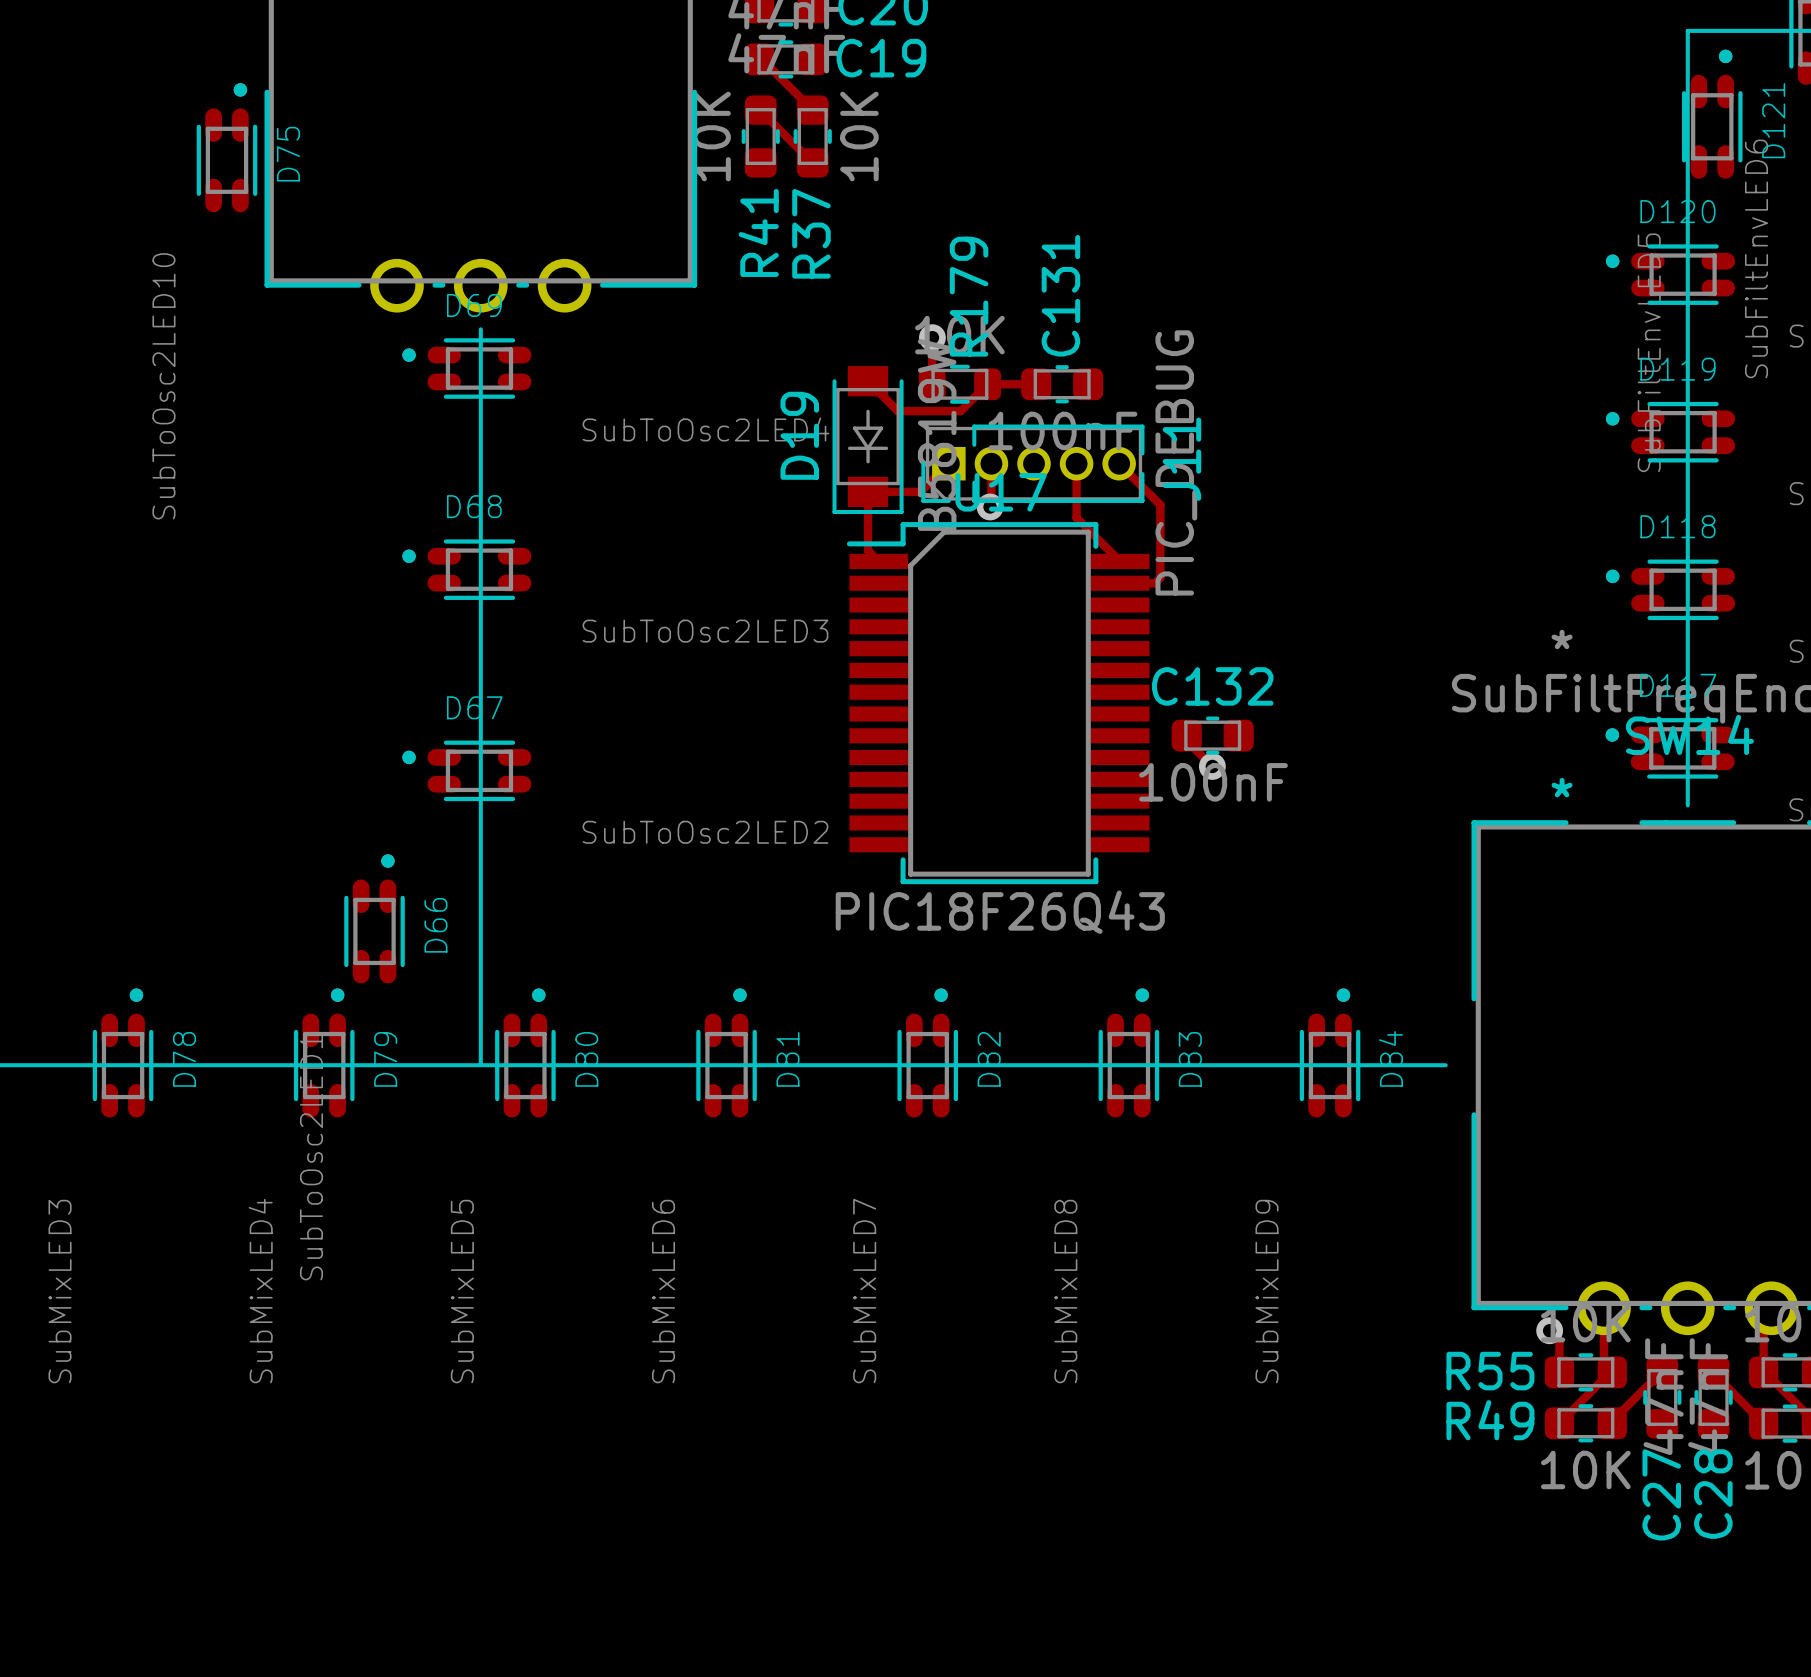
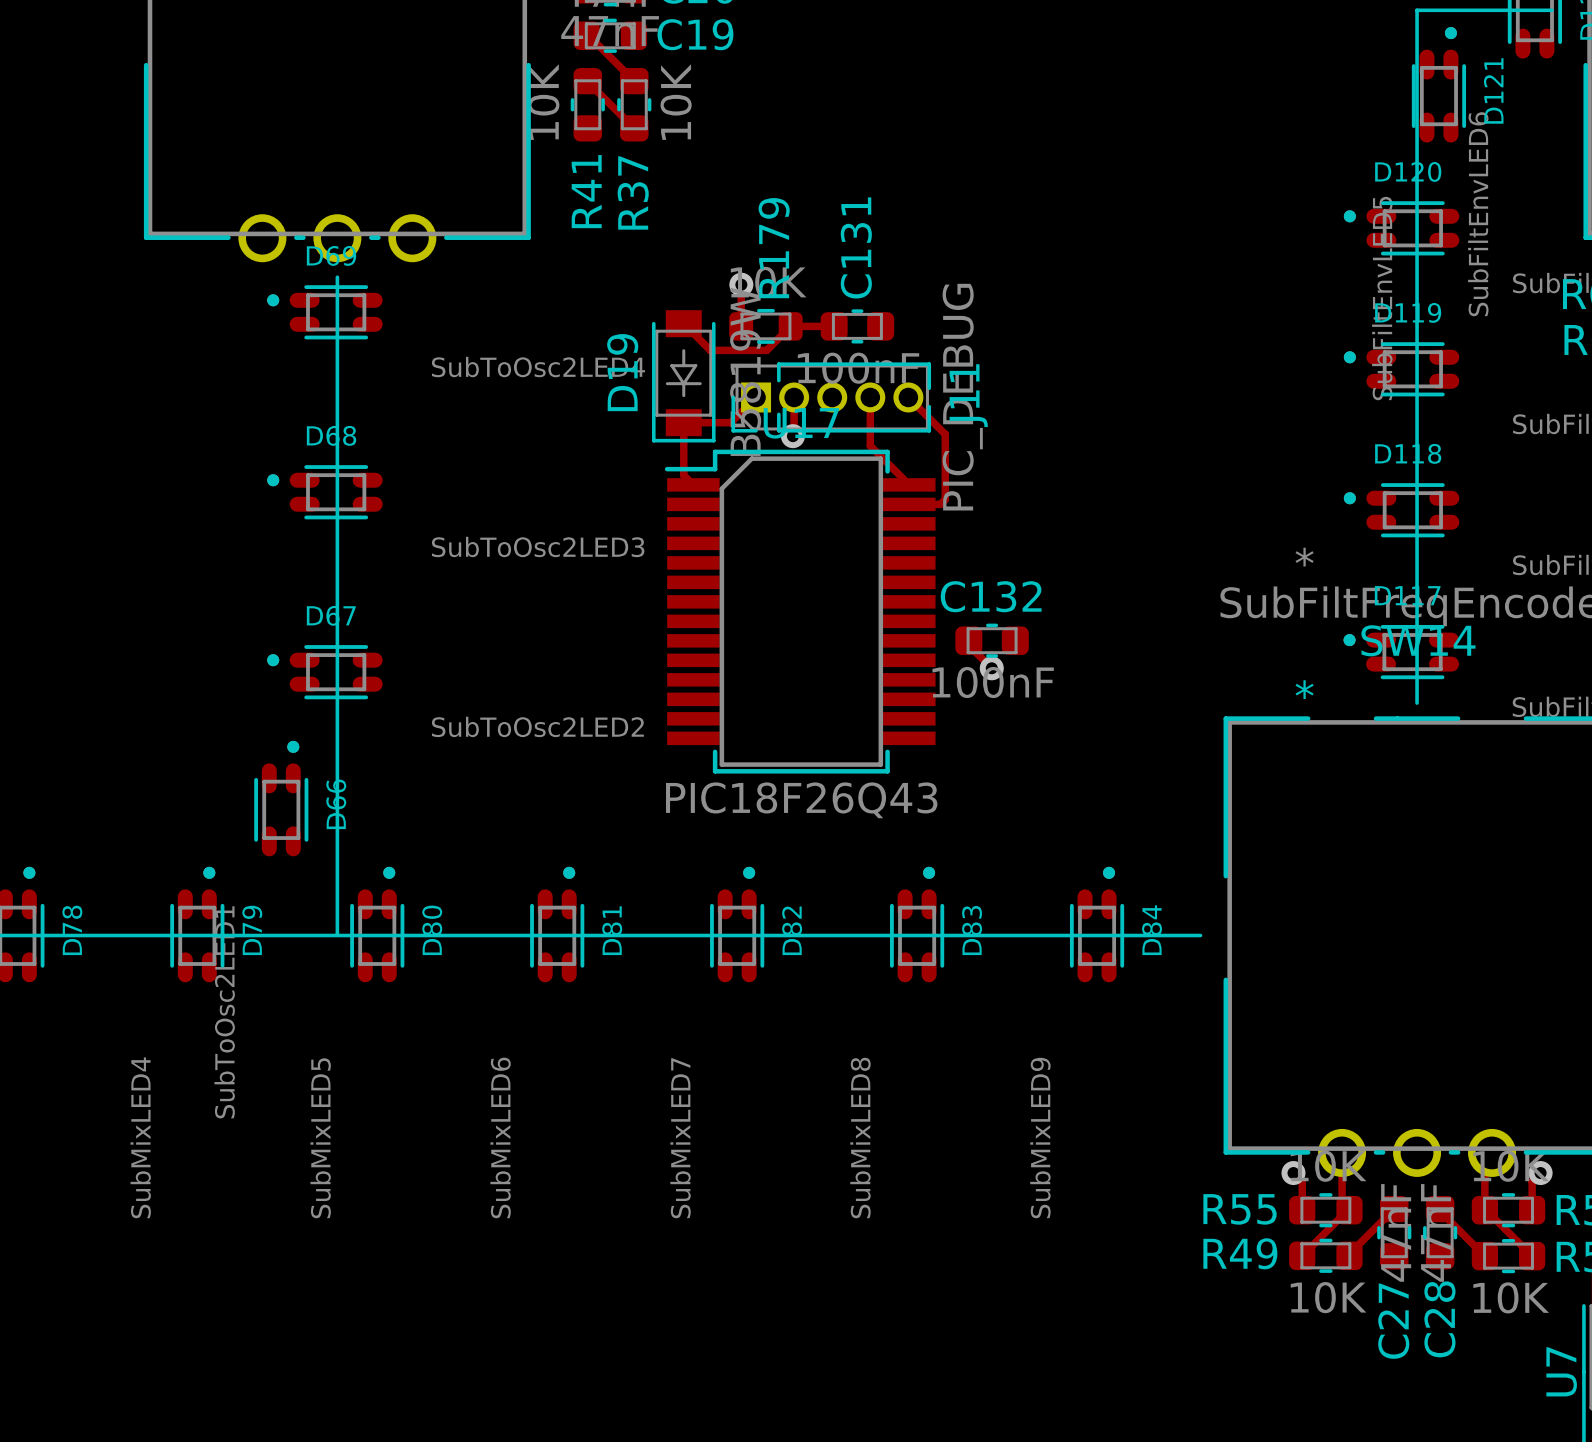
D75: SubToOsc2LED10 (227, 147) -> none
D66 position: (374, 918) -> (281, 798)

